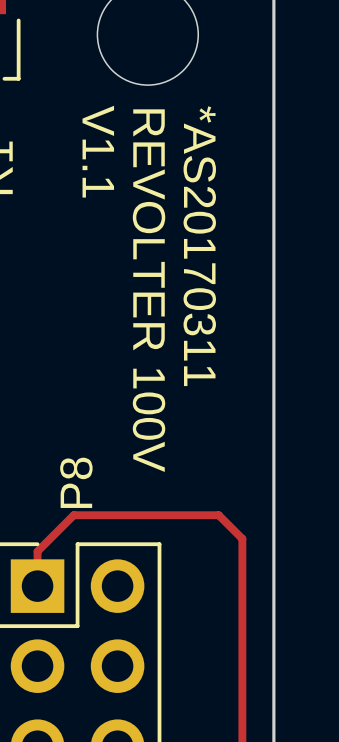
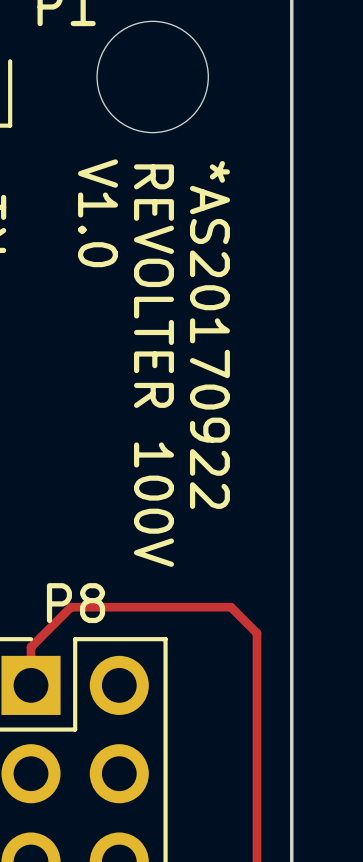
text: V1.1 (98, 151) -> V1.0 (98, 213)
text: *AS20170311 (199, 246) -> *AS20170922 (209, 334)
P8 name rotation: 0° (76, 482) -> 90° clockwise (75, 603)

